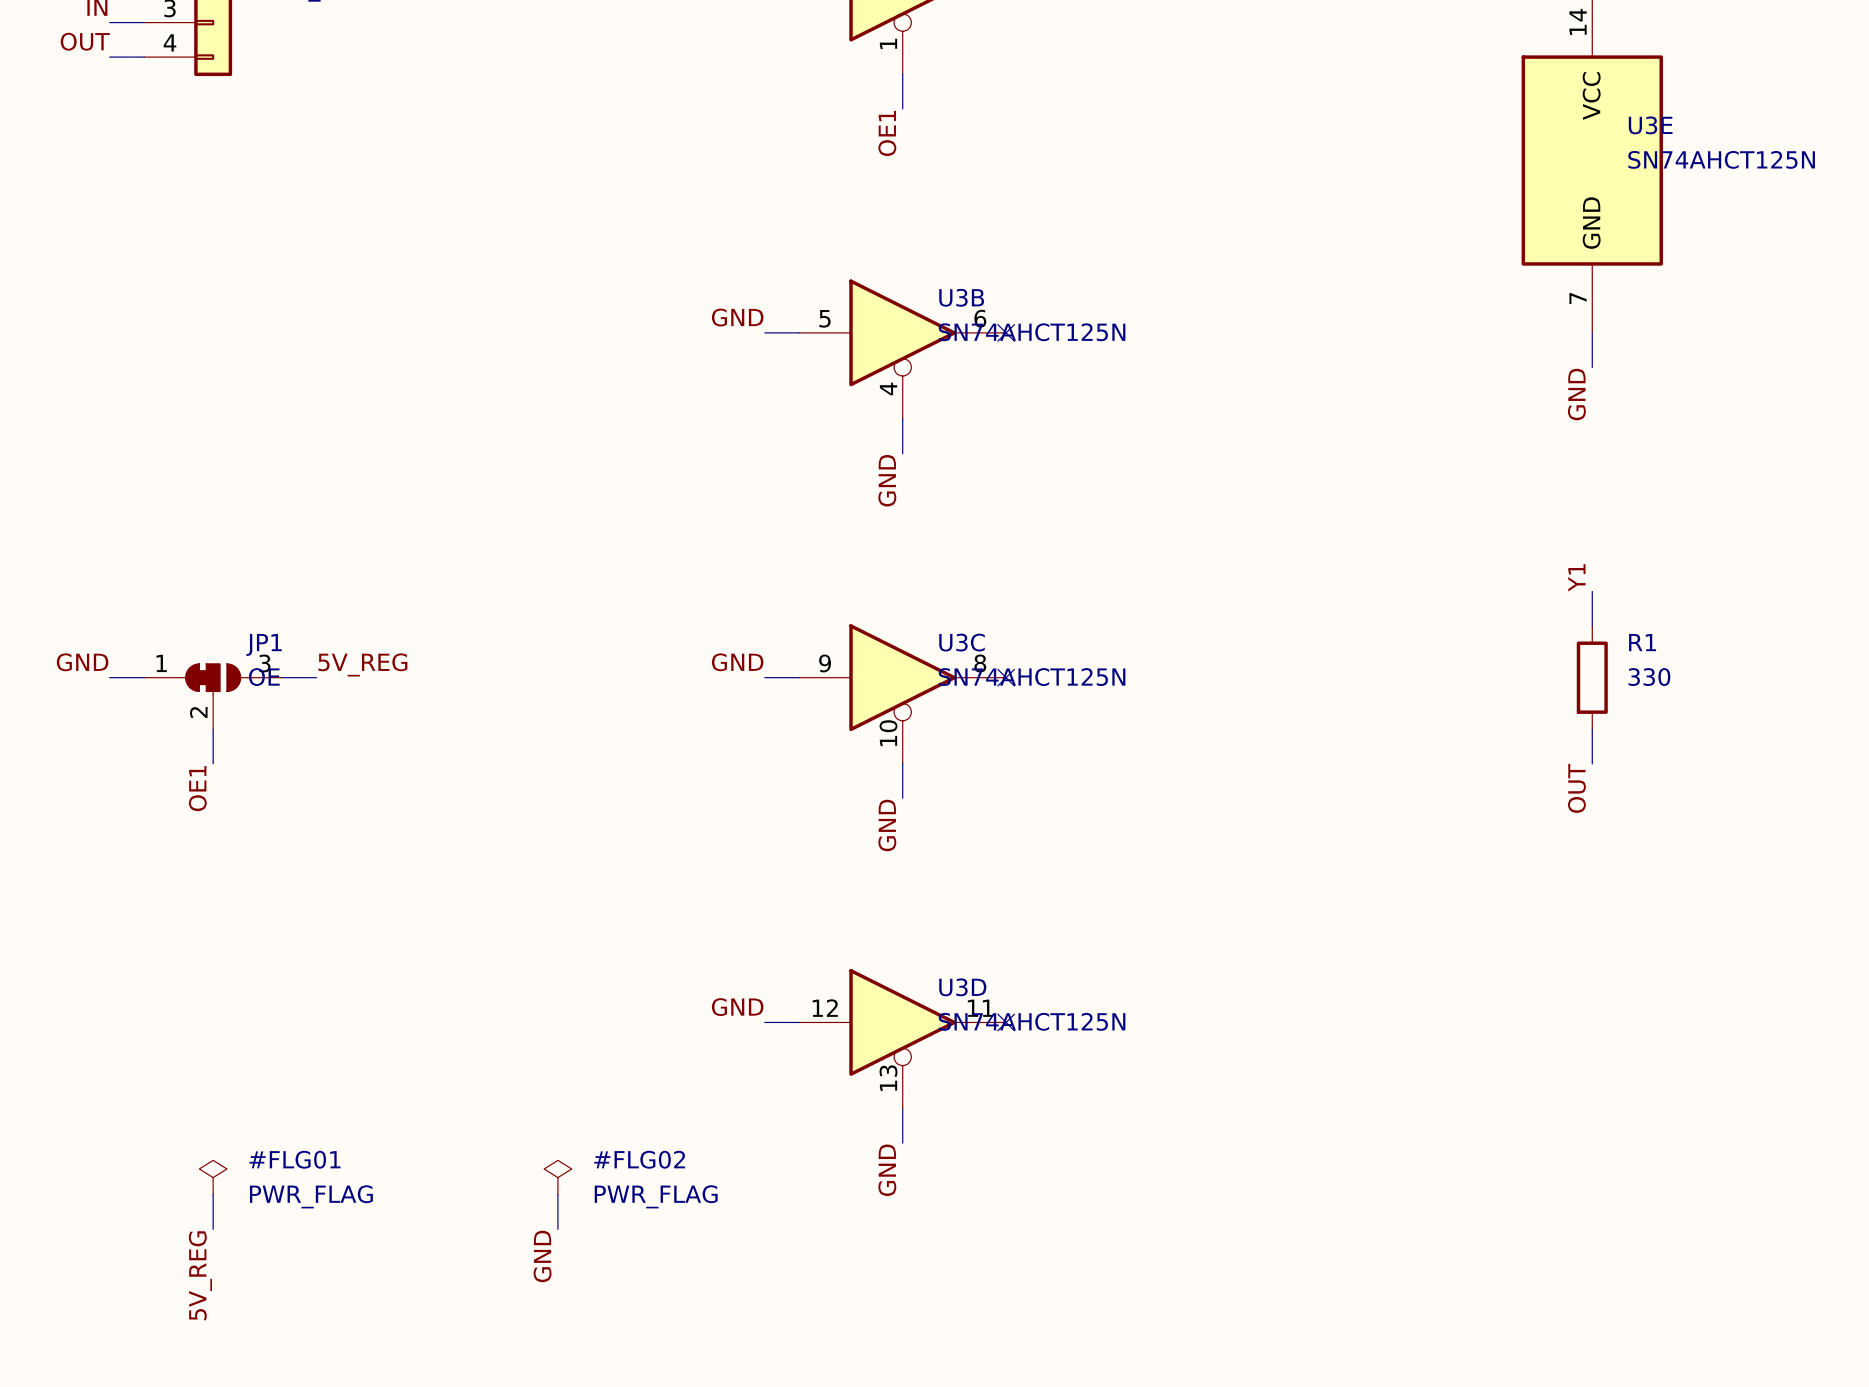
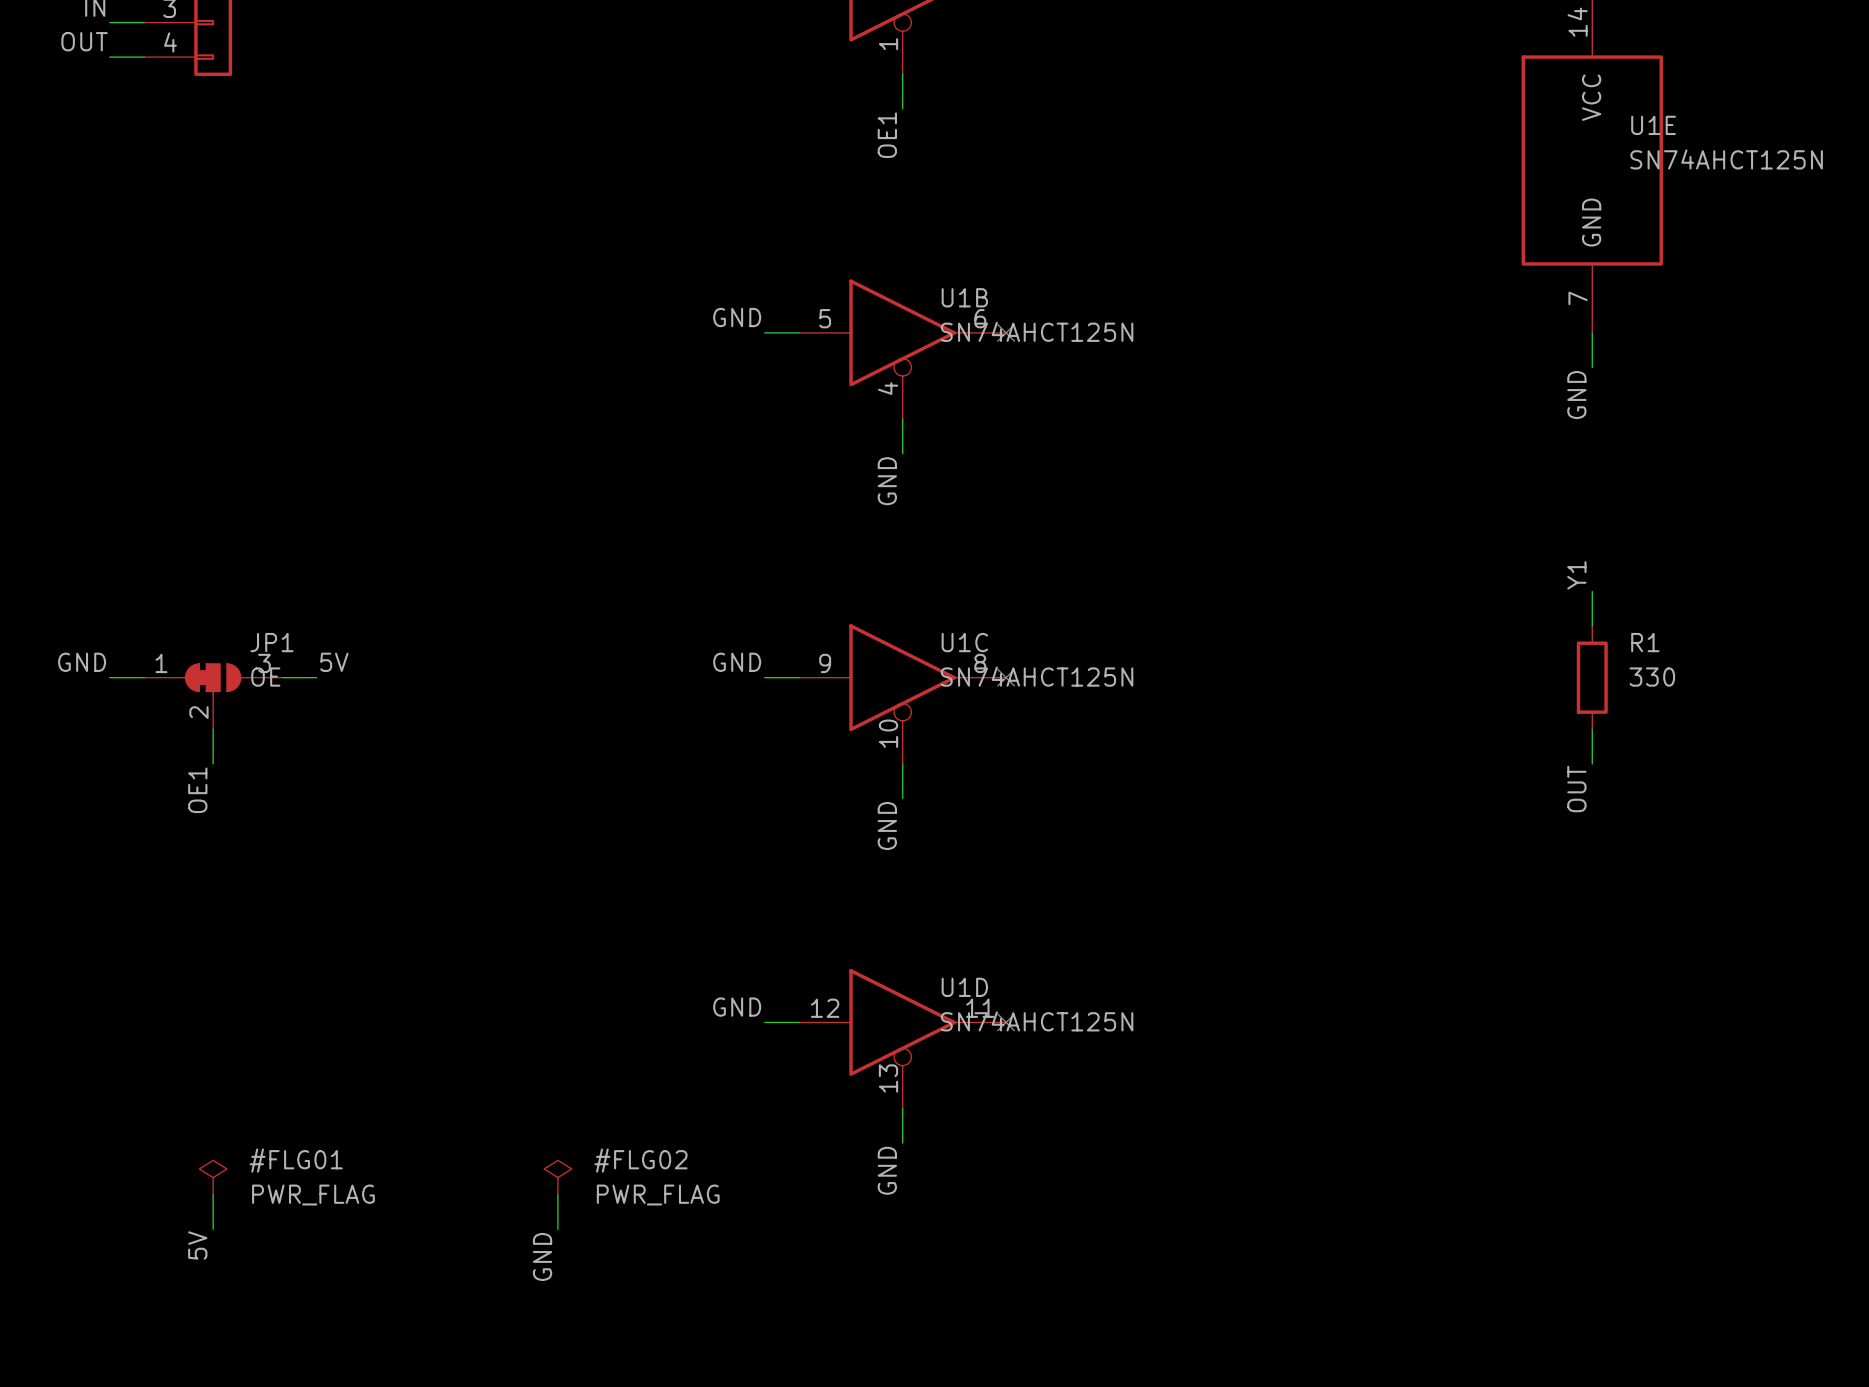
U3E name: U3E (1650, 125) -> U1E (1653, 125)
U3B name: U3B (961, 297) -> U1B (964, 297)
U3C name: U3C (962, 642) -> U1C (964, 642)
label: 5V_REG (362, 664) -> 5V (334, 662)
U3D name: U3D (962, 987) -> U1D (964, 987)
label: 5V_REG (200, 1275) -> 5V (197, 1245)

